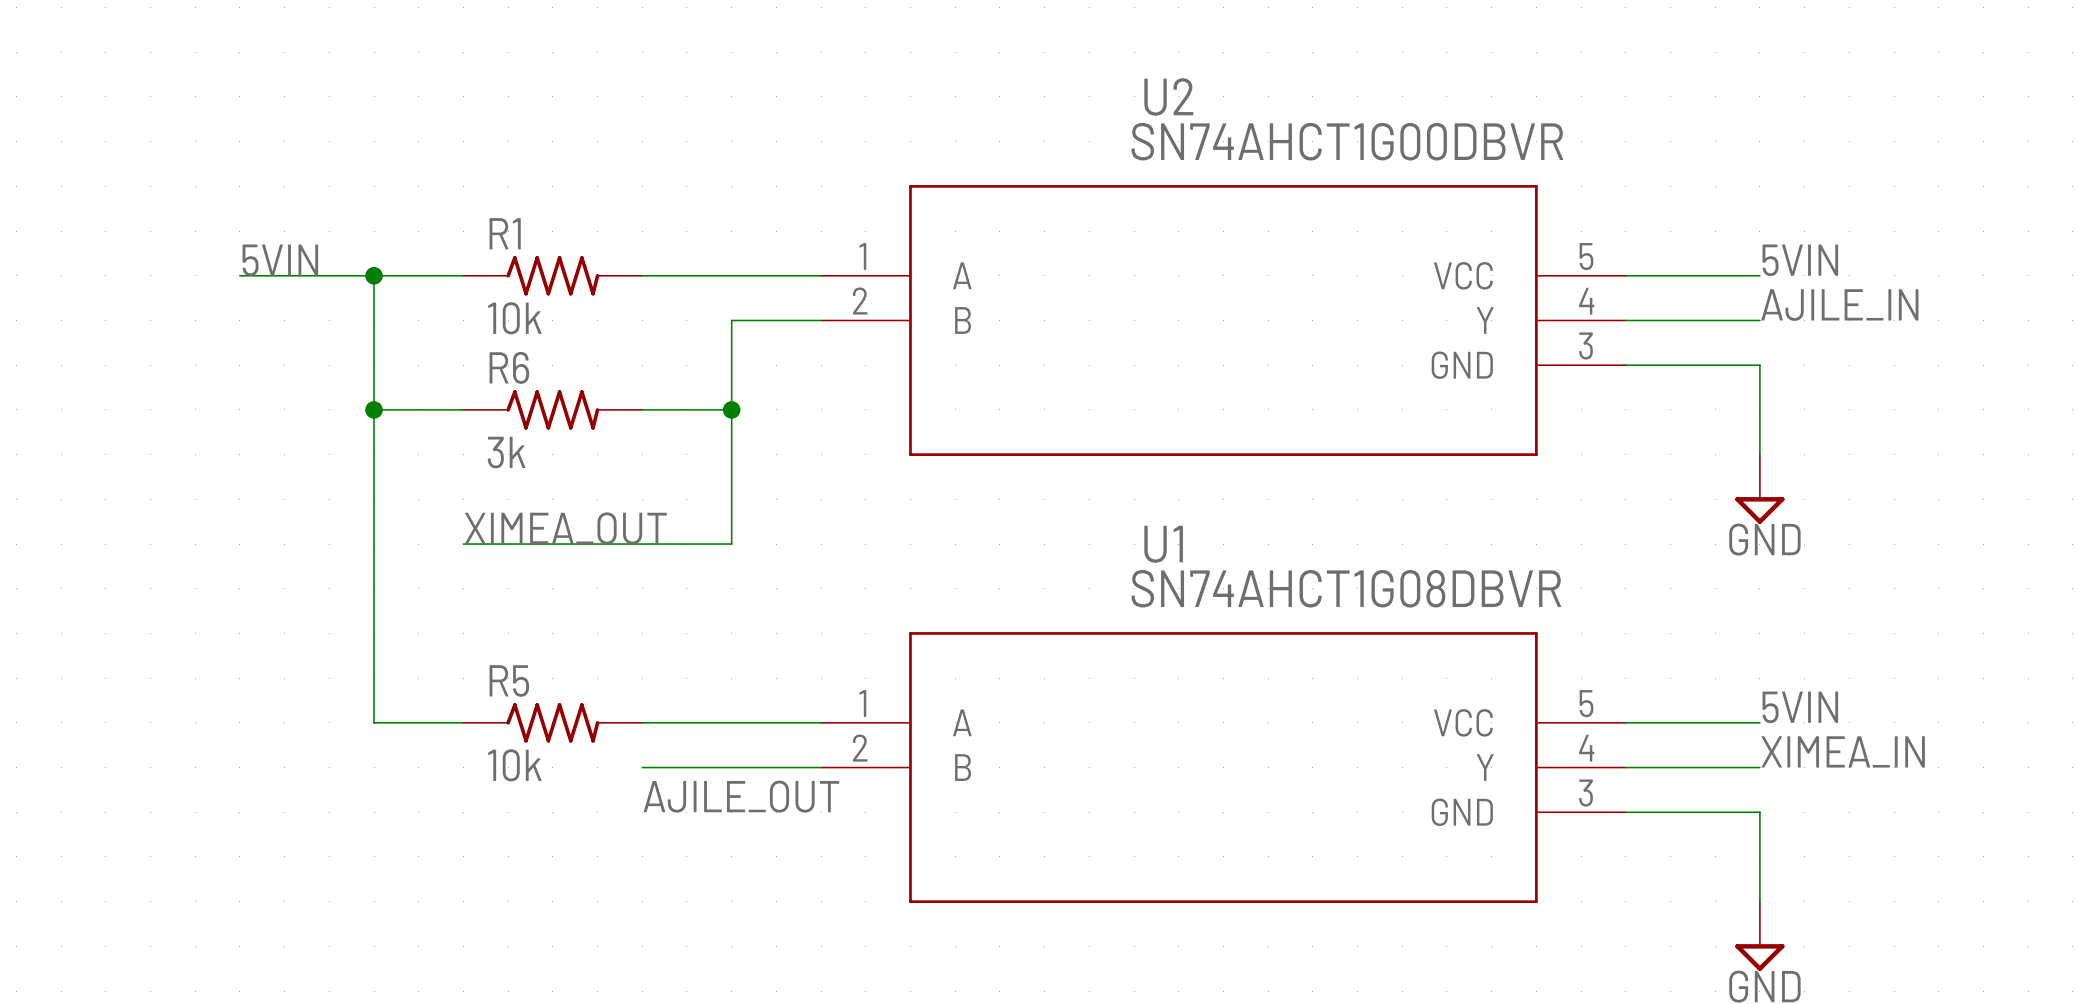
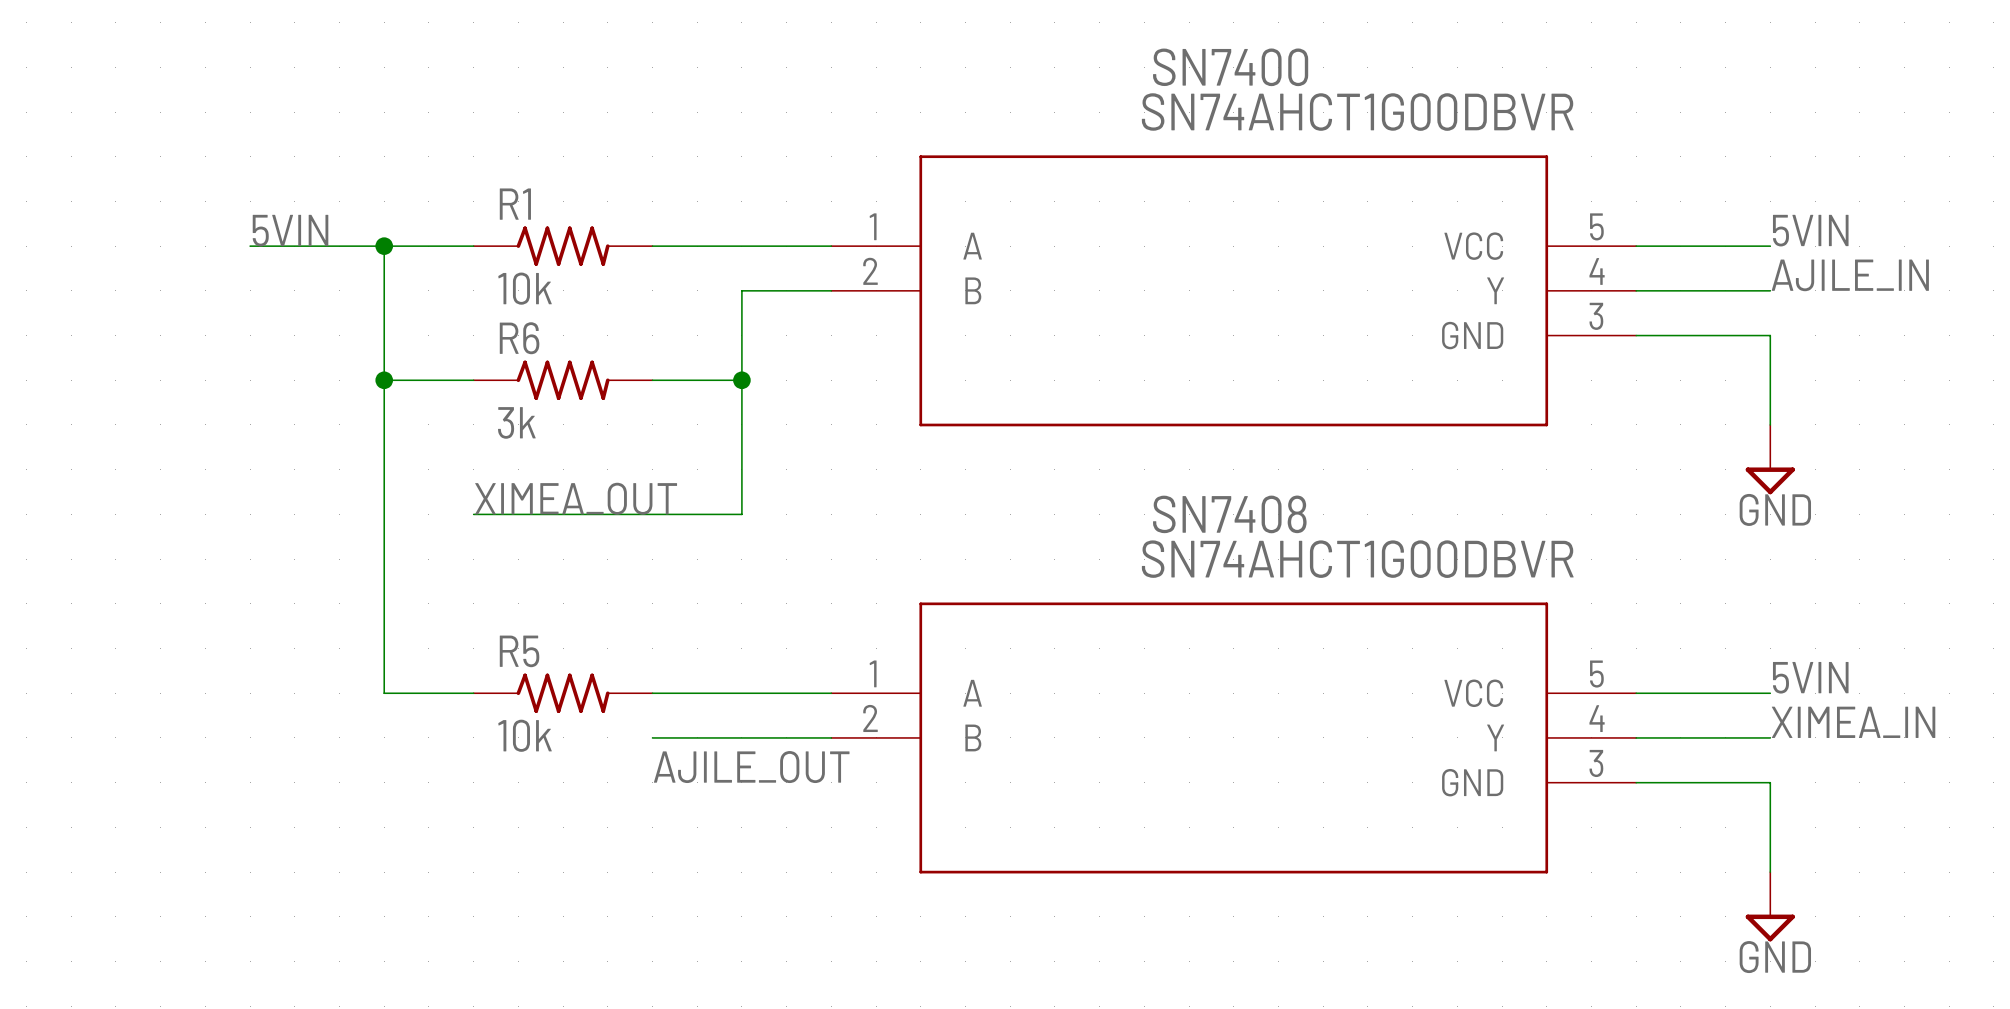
U2 name: U2 (1168, 96) -> SN7400 (1230, 67)
U1 name: U1 (1163, 544) -> SN7408 (1229, 514)
U1 value: SN74AHCT1G08DBVR (1346, 588) -> SN74AHCT1G00DBVR (1357, 559)

